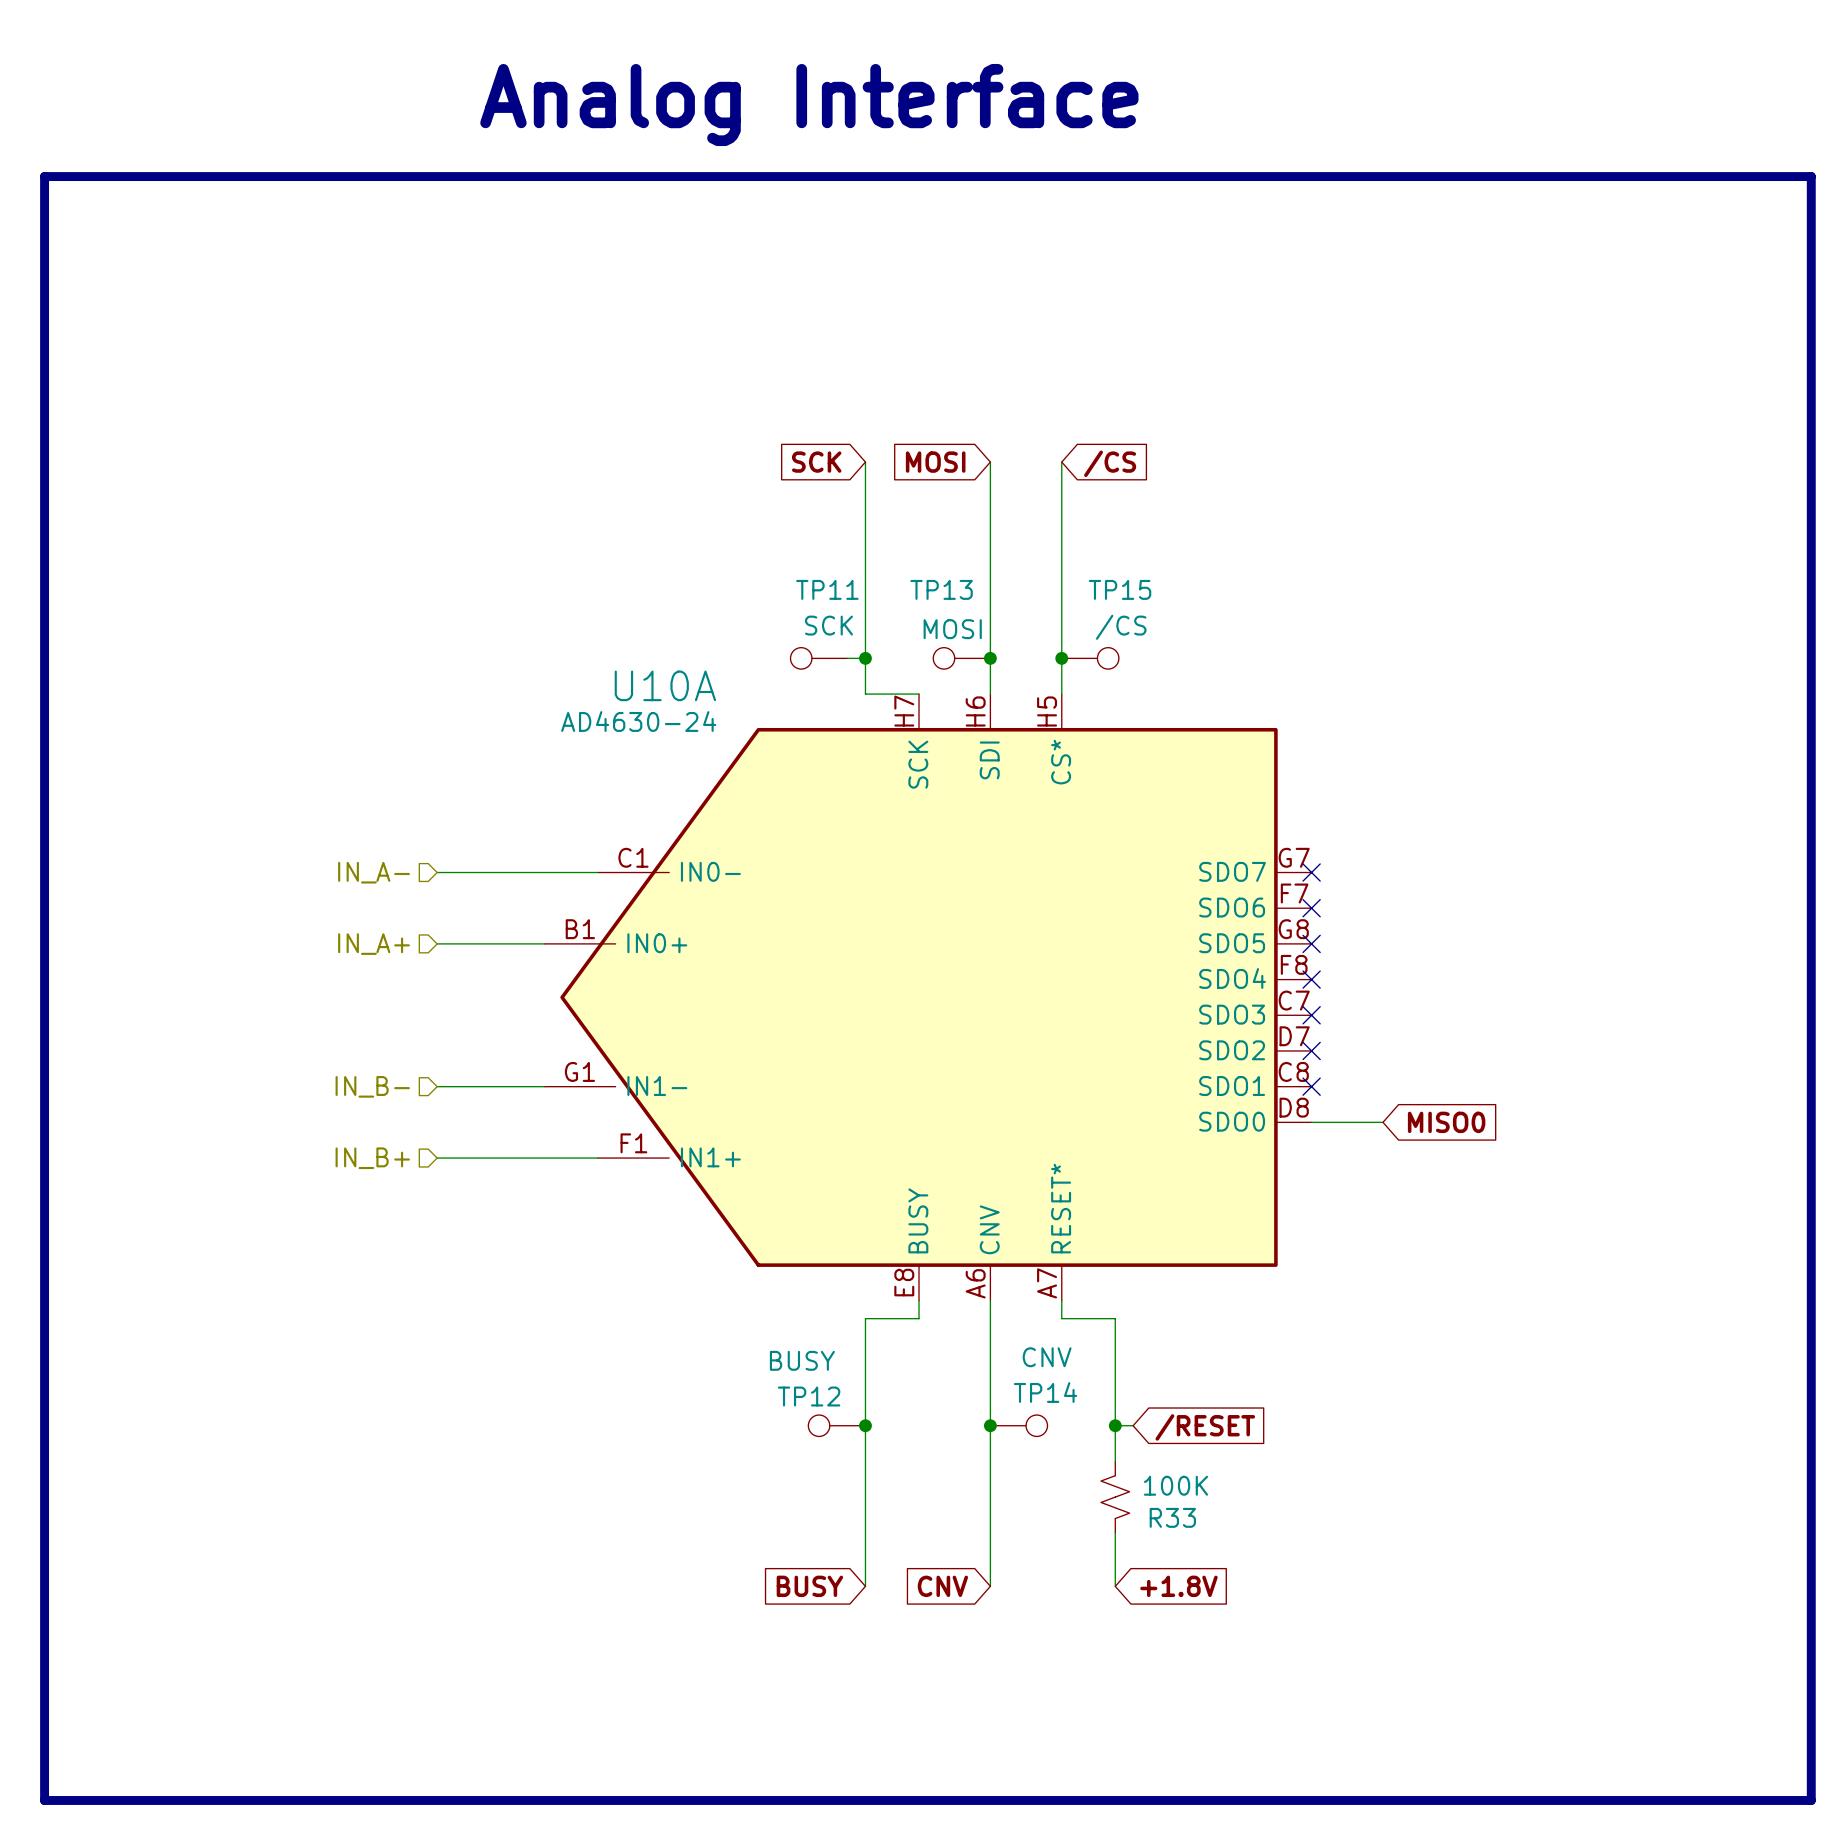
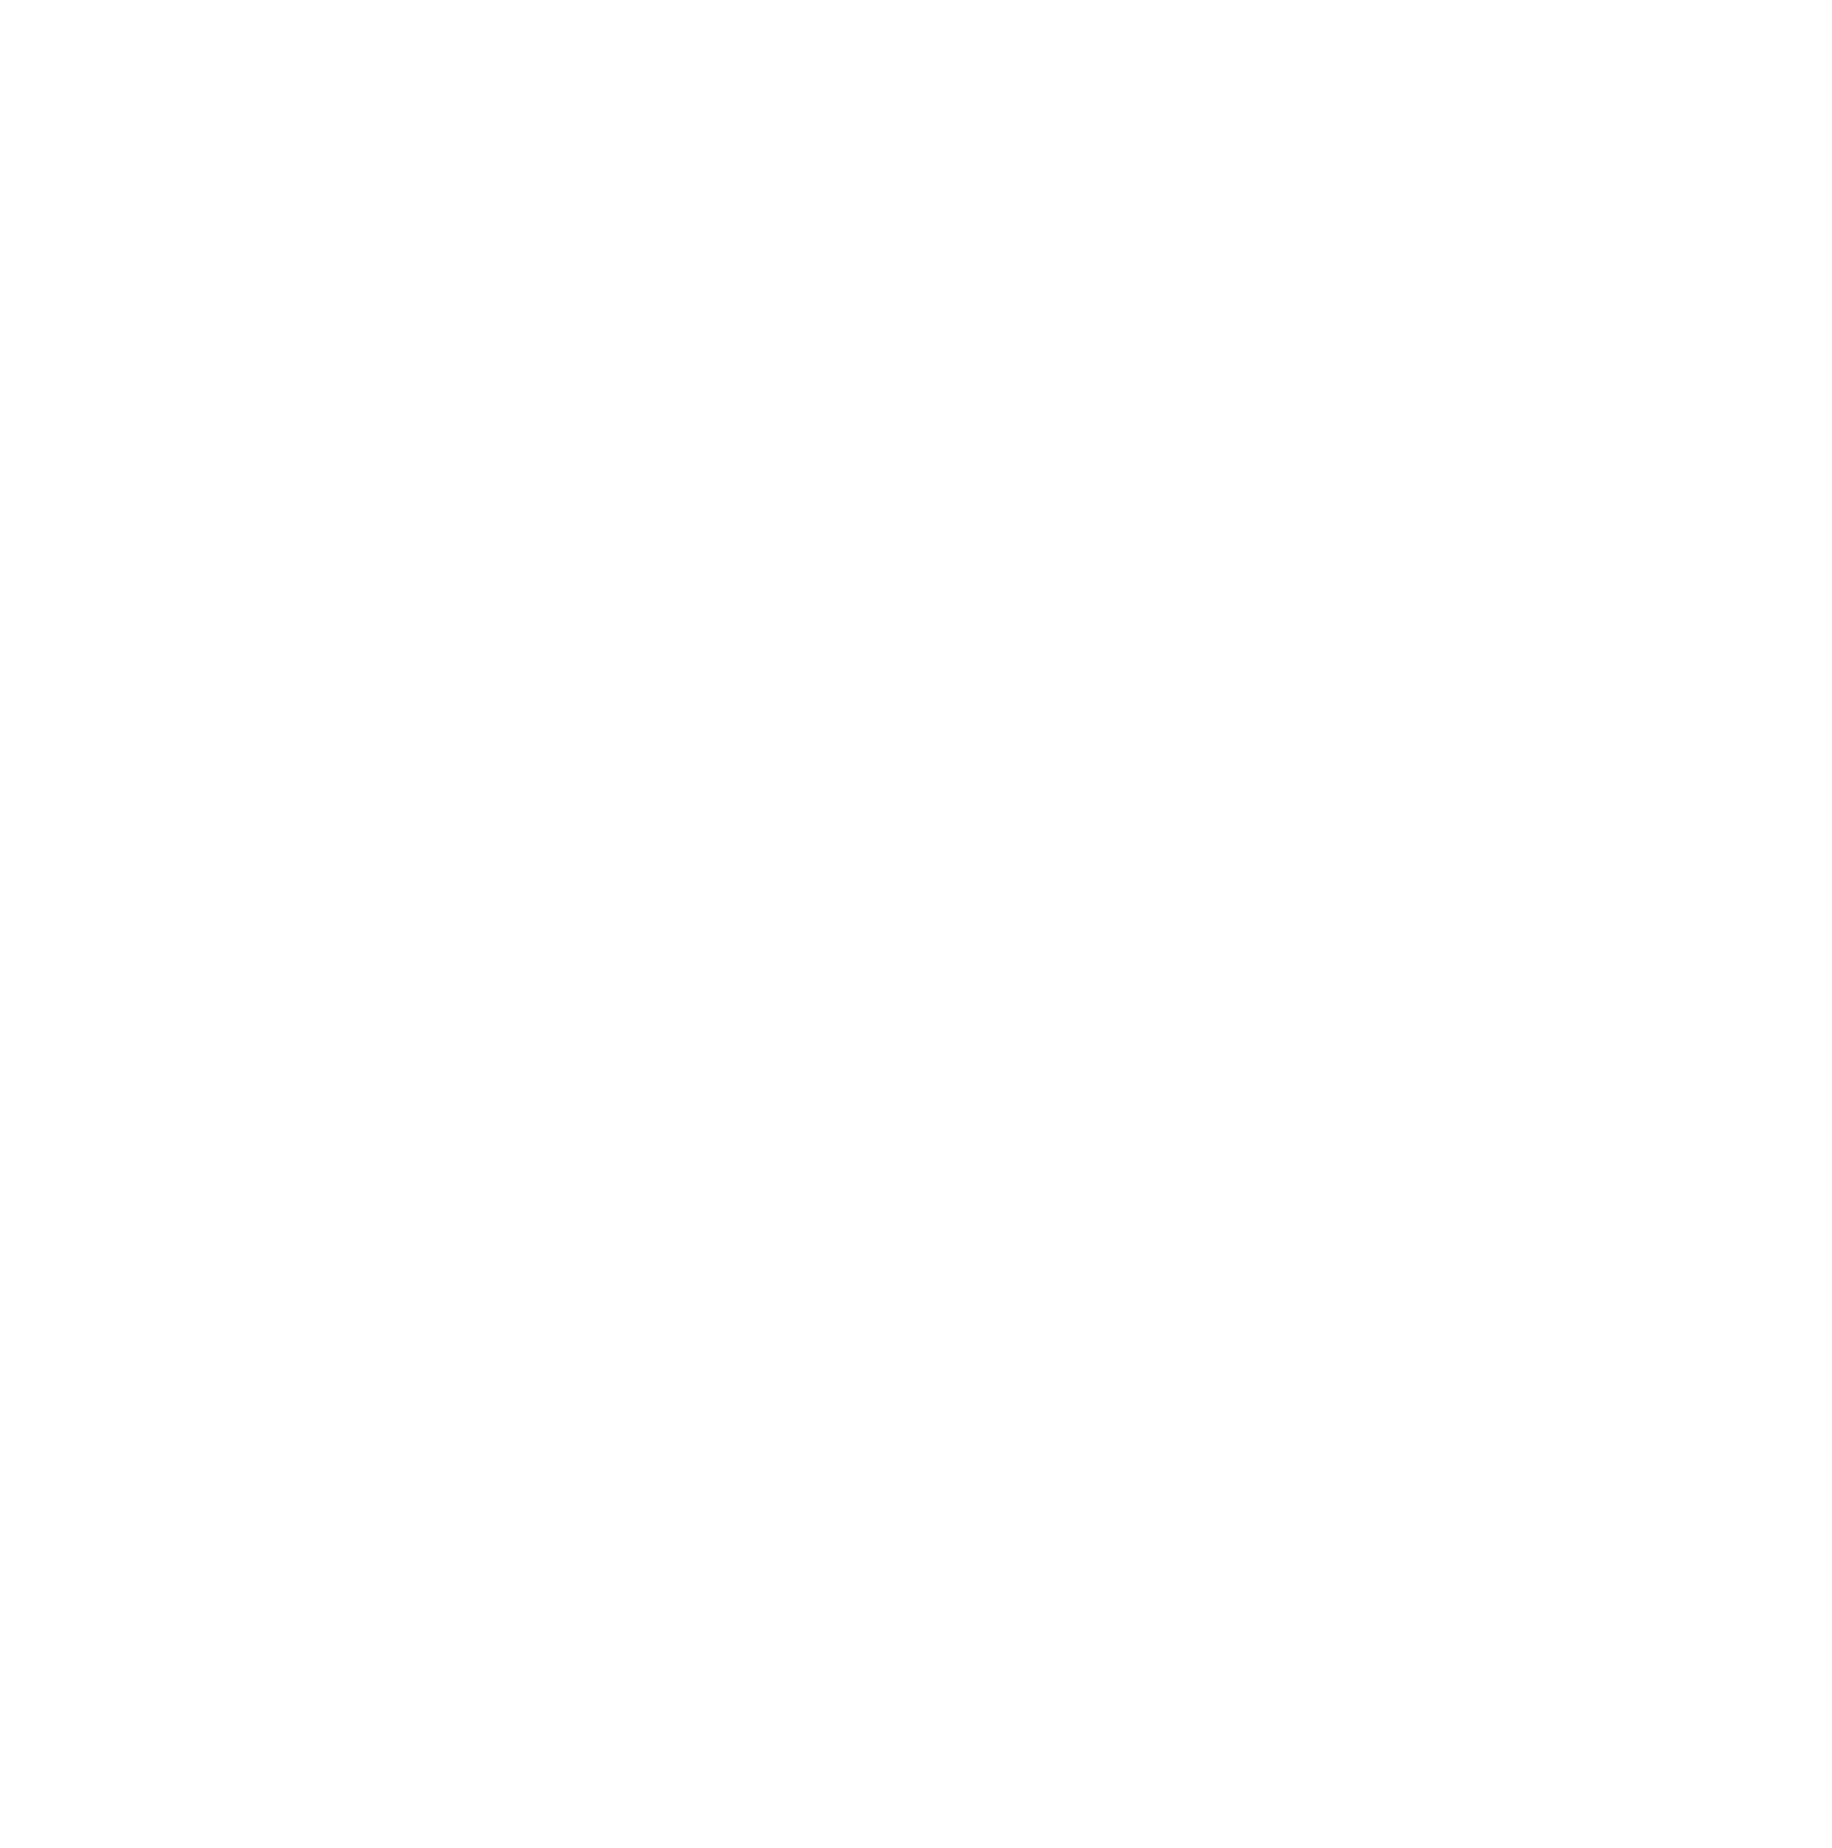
text: Analog Interface (809, 105) -> none
line: (44, 176) (1811, 176) (1811, 1800) (44, 1800) (44, 176) -> none
global label: SCK (816, 462) -> none
wire: (865, 462) (865, 694) (919, 694) -> none
global label: MOSI (935, 462) -> none
wire: (990, 462) (990, 694) -> none
wire: (1061, 462) (1061, 694) -> none
global label: /CS (1110, 463) -> none
TP11: SCK (819, 658) -> none
wire: (847, 658) (865, 658) -> none
junction: (865, 658) -> none
TP13: MOSI (961, 658) -> none
junction: (990, 658) -> none
junction: (1061, 658) -> none
TP15: /CS (1090, 658) -> none
hierarchical label: IN_A- (374, 872) -> none
wire: (437, 872) (597, 872) -> none
no-connect mark: (1311, 872) -> none
no-connect mark: (1311, 908) -> none
wire: (437, 943) (544, 943) -> none
no-connect mark: (1311, 943) -> none
hierarchical label: IN_A+ (374, 944) -> none
no-connect mark: (1311, 979) -> none
U10A: AD4630-24 (927, 997) -> none
no-connect mark: (1311, 1015) -> none
no-connect mark: (1311, 1050) -> none
hierarchical label: IN_B- (372, 1086) -> none
wire: (437, 1086) (544, 1086) -> none
no-connect mark: (1311, 1086) -> none
wire: (1311, 1122) (1382, 1122) -> none
global label: MISO0 (1446, 1122) -> none
hierarchical label: IN_B+ (372, 1158) -> none
wire: (437, 1158) (597, 1158) -> none
wire: (919, 1300) (919, 1318) (865, 1318) (865, 1586) -> none
wire: (990, 1300) (990, 1586) -> none
wire: (1061, 1300) (1061, 1318) (1115, 1318) (1115, 1461) -> none
TP12: BUSY (836, 1425) -> none
junction: (865, 1425) -> none
junction: (990, 1425) -> none
TP14: CNV (1018, 1425) -> none
wire: (1115, 1425) (1133, 1425) -> none
junction: (1115, 1425) -> none
global label: /RESET (1205, 1427) -> none
R33: 100K (1115, 1497) -> none
wire: (1115, 1532) (1115, 1586) -> none
global label: BUSY (809, 1586) -> none
global label: CNV (942, 1586) -> none
global label: +1.8V (1178, 1586) -> none

